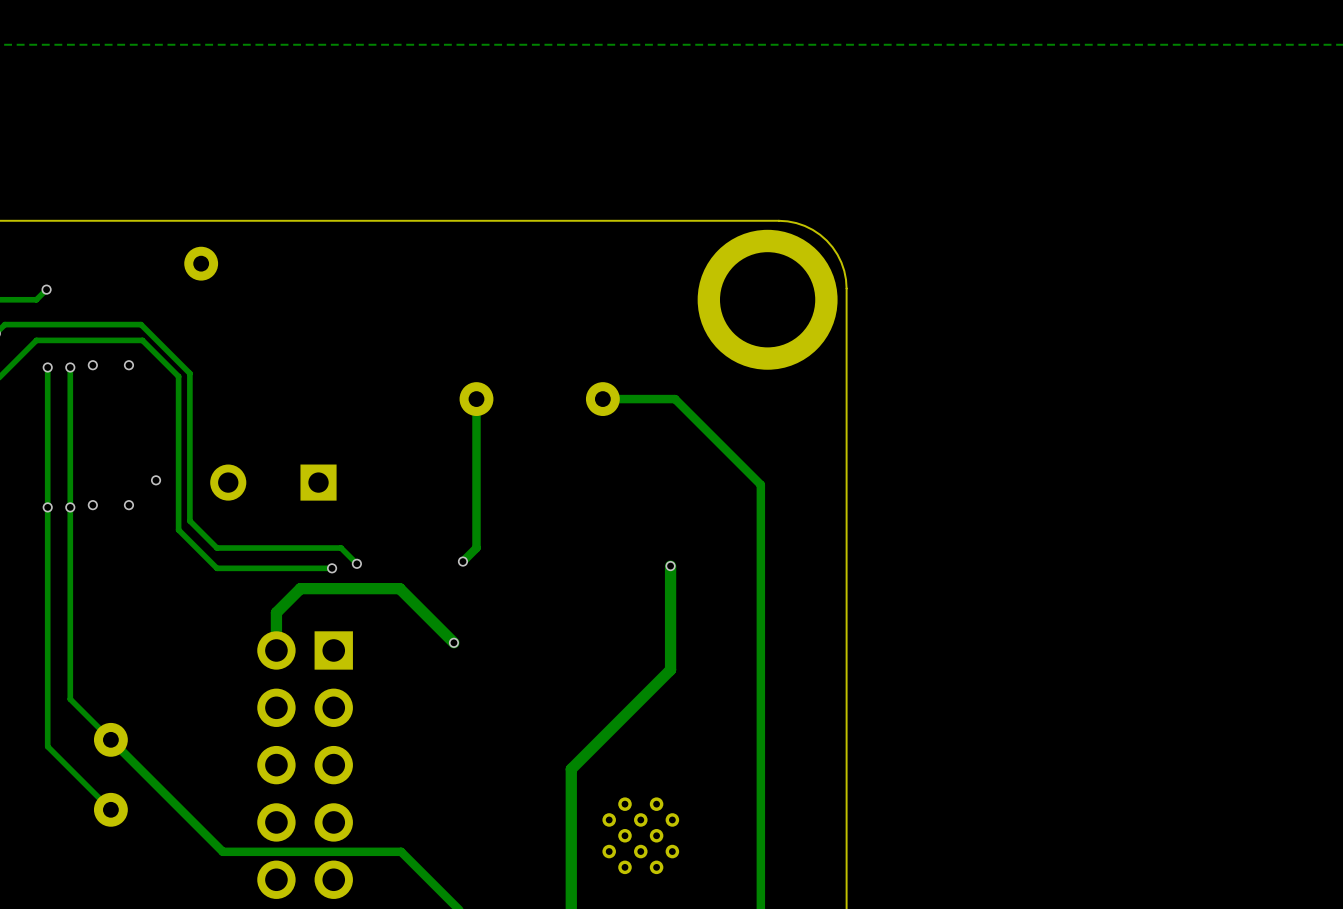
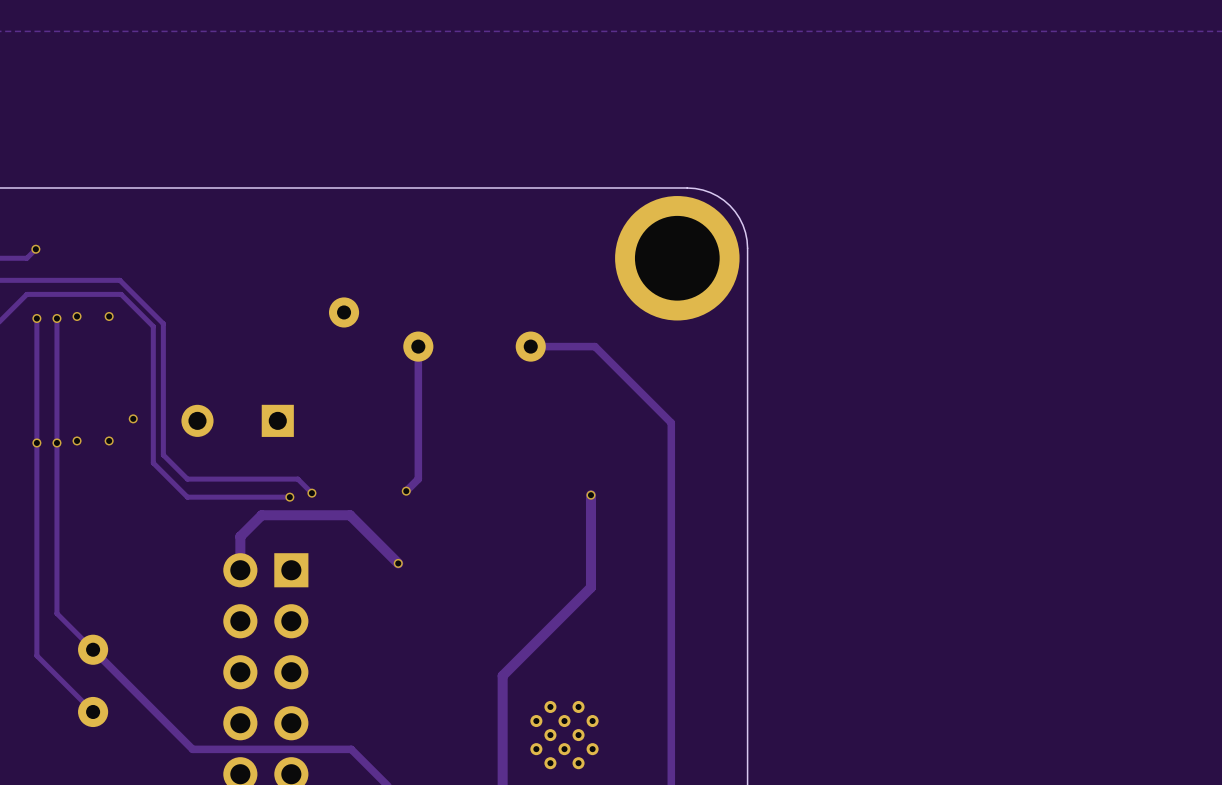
part position: (201, 263) -> (344, 312)

